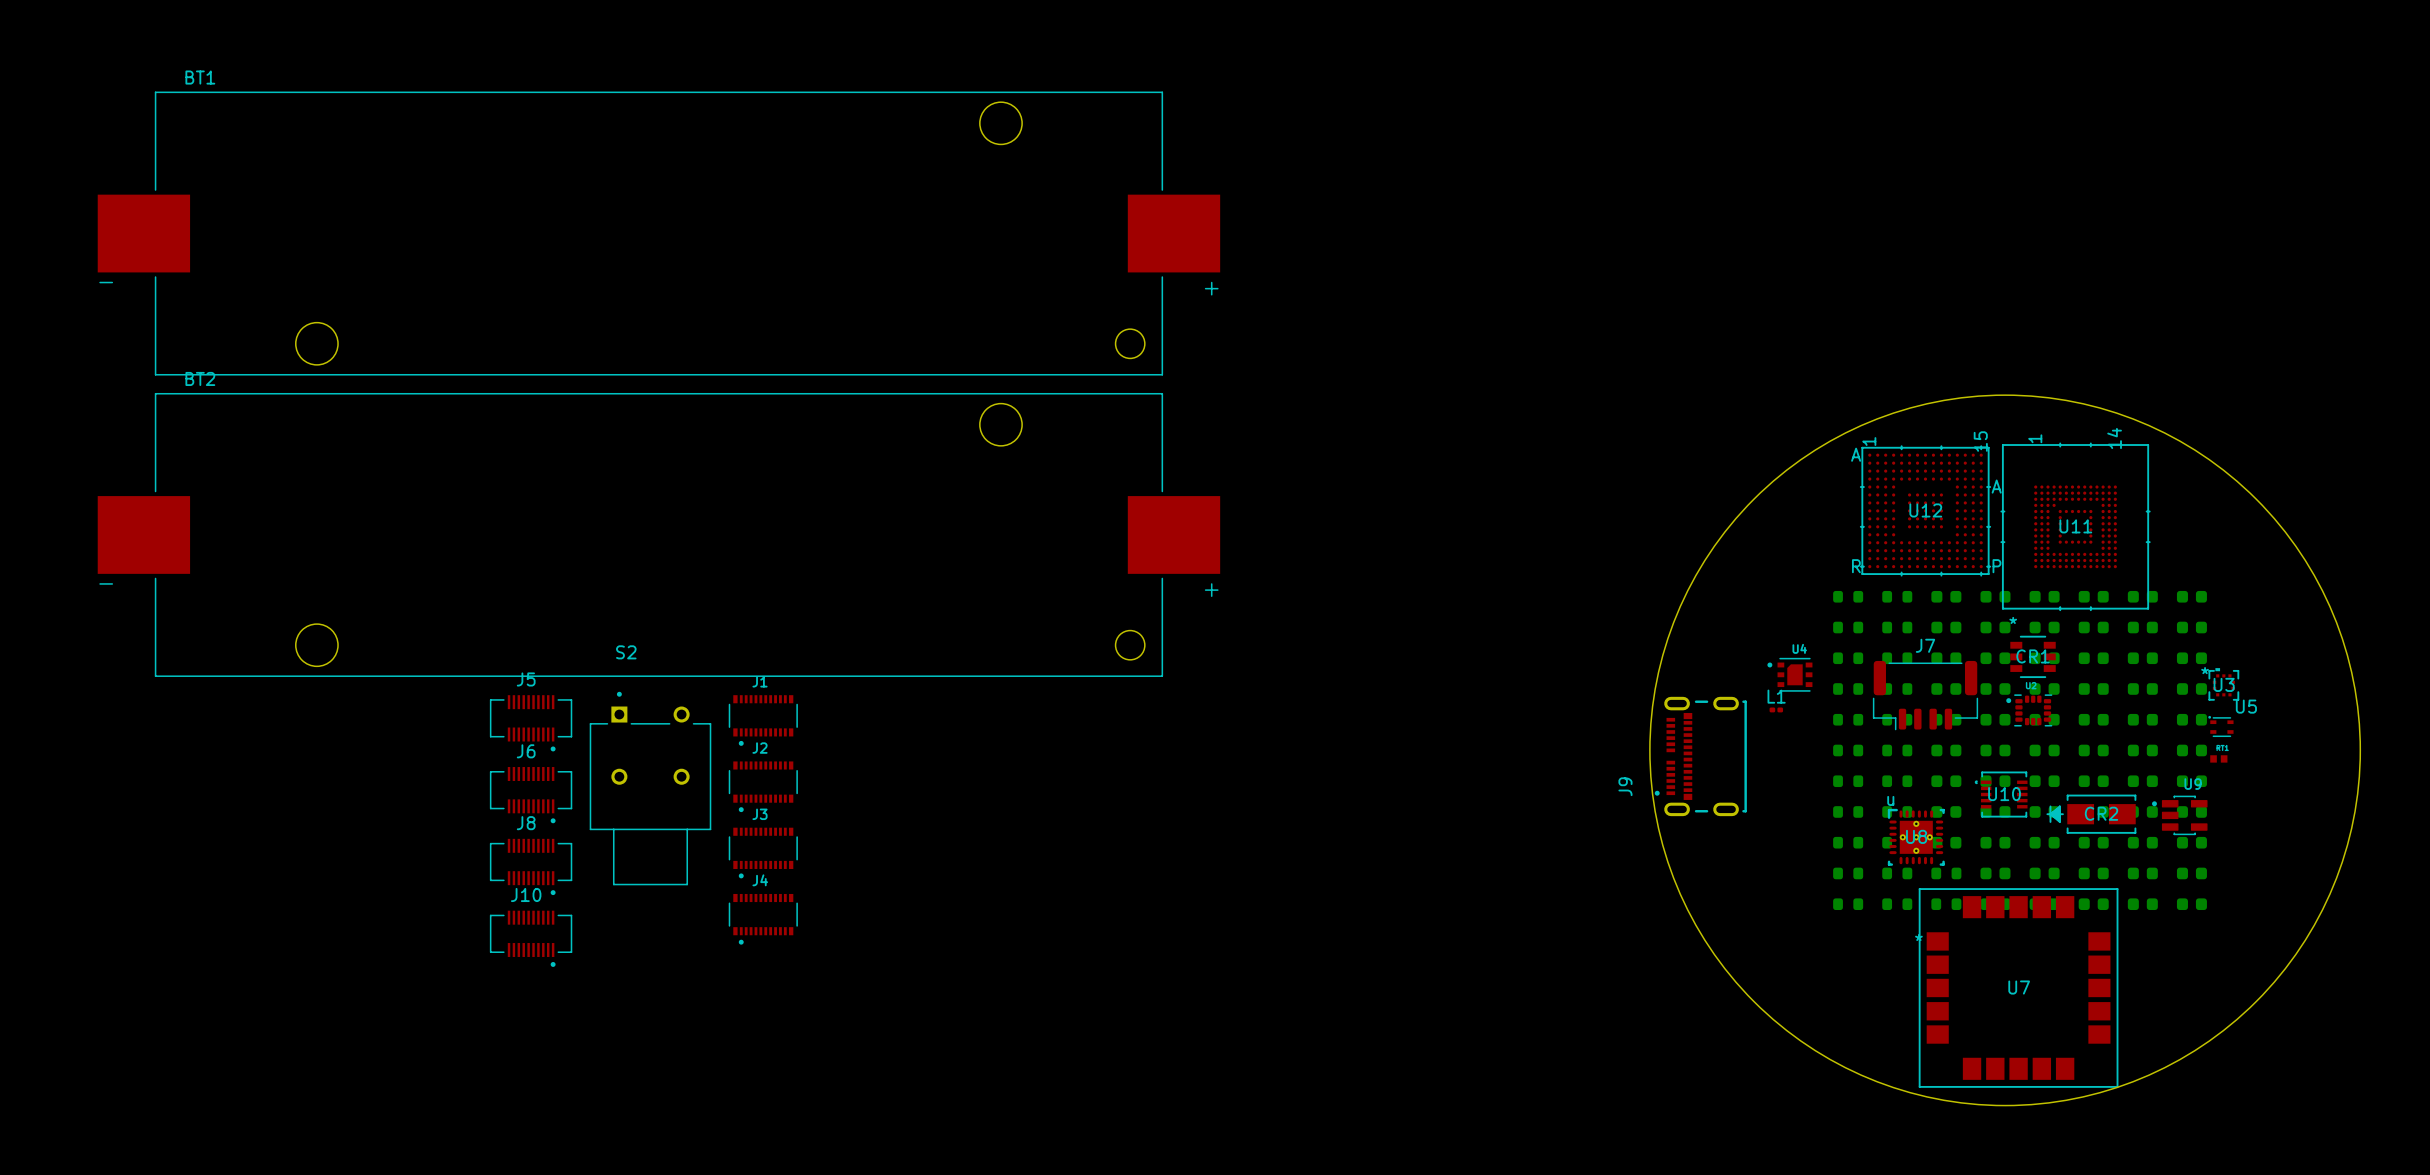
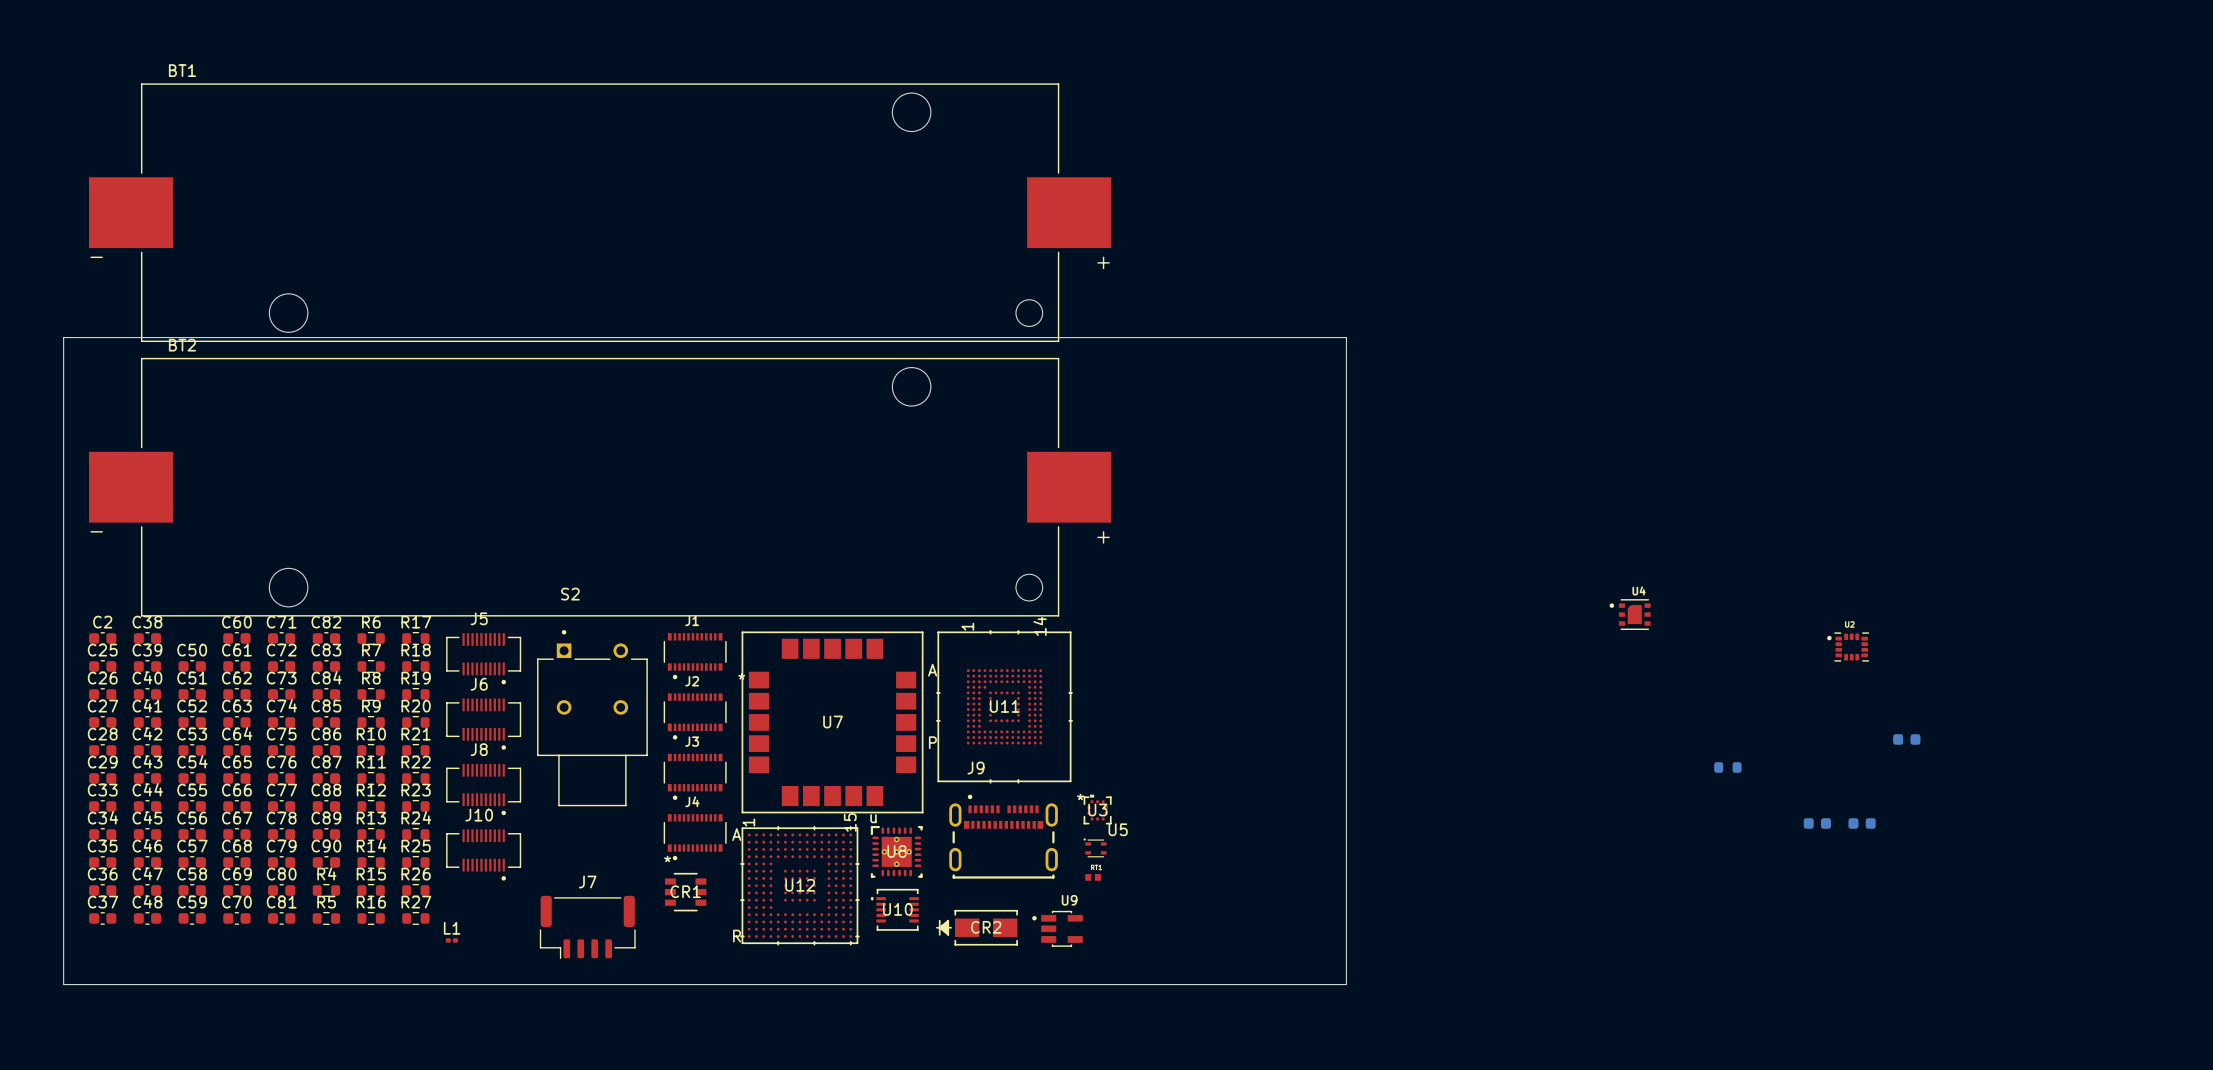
board edge: none -> (63, 337) (1346, 337) (1346, 984) (63, 984) (63, 337)
round board edge: [1649, 394, 2361, 1106] -> none
U12 position: (1925, 510) -> (799, 885)
U11 position: (2075, 526) -> (1004, 706)
part: (1848, 596) -> none
part: (1897, 596) -> none
part: (1946, 596) -> none
part: (1995, 596) -> none
part: (2044, 596) -> none
part: (2093, 596) -> none
part: (2142, 596) -> none
part: (2191, 596) -> none
part: (1848, 627) -> none
part: (1897, 627) -> none
part: (1946, 627) -> none
part: (1995, 627) -> none
part: (2044, 627) -> none
part: (2093, 627) -> none
part: (2142, 627) -> none
part: (2191, 627) -> none
CR1 position: (2033, 656) -> (685, 892)
part: (1848, 658) -> none
part: (1897, 658) -> none
part: (1946, 658) -> none
part: (1995, 658) -> none
part: (2044, 658) -> none
part: (2093, 658) -> none
part: (2142, 658) -> none
part: (2191, 658) -> none
U3 position: (2223, 684) -> (1097, 809)
part: (1848, 688) -> none
part: (1897, 688) -> none
part: (1946, 688) -> none
part: (1995, 688) -> none
part: (2044, 688) -> none
part: (2093, 688) -> none
part: (2142, 688) -> none
part: (2191, 688) -> none
J7 position: (1925, 695) -> (587, 927)
C2: none -> (102, 638)
C38: none -> (147, 638)
C60: none -> (236, 638)
C71: none -> (281, 638)
C82: none -> (326, 638)
R6: none -> (371, 638)
R17: none -> (415, 638)
L1 position: (1776, 709) -> (451, 940)
part: (1848, 719) -> none
part: (1897, 719) -> none
part: (1946, 719) -> none
part: (1995, 719) -> none
part: (2044, 719) -> none
part: (2093, 719) -> none
part: (2142, 719) -> none
part: (2191, 719) -> none
U5 position: (2220, 726) -> (1095, 847)
C25: none -> (102, 666)
C39: none -> (147, 666)
C50: none -> (192, 666)
C61: none -> (236, 666)
C72: none -> (281, 666)
C83: none -> (326, 666)
R7: none -> (371, 666)
R18: none -> (415, 666)
part: (1848, 750) -> none
part: (1897, 750) -> none
part: (1946, 750) -> none
part: (1995, 750) -> none
part: (2044, 750) -> none
part: (2093, 750) -> none
part: (2142, 750) -> none
part: (2191, 750) -> none
J9 rotation: 0° (1700, 756) -> 90° clockwise (1003, 836)
J9 position: (1700, 756) -> (1003, 836)
part position: (2218, 758) -> (1093, 877)
C26: none -> (102, 694)
C40: none -> (147, 694)
C51: none -> (192, 694)
C62: none -> (236, 694)
C73: none -> (281, 694)
C84: none -> (326, 694)
R8: none -> (371, 694)
R19: none -> (415, 694)
part: (1848, 781) -> none
part: (1897, 781) -> none
part: (1946, 781) -> none
part: (1995, 781) -> none
part: (2044, 781) -> none
part: (2093, 781) -> none
part: (2142, 781) -> none
part: (2191, 781) -> none
C27: none -> (102, 722)
C41: none -> (147, 722)
C52: none -> (192, 722)
C63: none -> (236, 722)
C74: none -> (281, 722)
C85: none -> (326, 722)
R9: none -> (371, 722)
R20: none -> (415, 722)
U10 position: (2001, 794) -> (894, 909)
part: (1848, 811) -> none
part: (1897, 811) -> none
part: (1946, 811) -> none
part: (1995, 811) -> none
part: (2044, 811) -> none
part: (2142, 811) -> none
part: (2191, 811) -> none
CR2 position: (2091, 814) -> (976, 927)
U9 position: (2179, 815) -> (1057, 928)
C28: none -> (102, 750)
C42: none -> (147, 750)
C53: none -> (192, 750)
C64: none -> (236, 750)
C75: none -> (281, 750)
C86: none -> (326, 750)
R10: none -> (371, 750)
R21: none -> (415, 750)
U8 position: (1916, 837) -> (896, 851)
part: (1848, 842) -> none
part: (1946, 842) -> none
part: (1995, 842) -> none
part: (2044, 842) -> none
part: (2093, 842) -> none
part: (2142, 842) -> none
part: (2191, 842) -> none
C29: none -> (102, 778)
C43: none -> (147, 778)
C54: none -> (192, 778)
C65: none -> (236, 778)
C76: none -> (281, 778)
C87: none -> (326, 778)
R11: none -> (371, 778)
R22: none -> (415, 778)
part: (1848, 873) -> none
part: (1897, 873) -> none
part: (1946, 873) -> none
part: (1995, 873) -> none
part: (2044, 873) -> none
part: (2093, 873) -> none
part: (2142, 873) -> none
part: (2191, 873) -> none
C33: none -> (102, 806)
C44: none -> (147, 806)
C55: none -> (192, 806)
C66: none -> (236, 806)
C77: none -> (281, 806)
C88: none -> (326, 806)
R12: none -> (371, 806)
R23: none -> (415, 806)
part: (1848, 904) -> none
part: (1897, 904) -> none
part: (1946, 904) -> none
part: (2093, 904) -> none
part: (2142, 904) -> none
part: (2191, 904) -> none
C34: none -> (102, 834)
C45: none -> (147, 834)
C56: none -> (192, 834)
C67: none -> (236, 834)
C78: none -> (281, 834)
C89: none -> (326, 834)
R13: none -> (371, 834)
R24: none -> (415, 834)
C35: none -> (102, 862)
C46: none -> (147, 862)
C57: none -> (192, 862)
C68: none -> (236, 862)
C79: none -> (281, 862)
C90: none -> (326, 862)
R14: none -> (371, 862)
R25: none -> (415, 862)
C36: none -> (102, 890)
C47: none -> (147, 890)
C58: none -> (192, 890)
C69: none -> (236, 890)
C80: none -> (281, 890)
R4: none -> (326, 890)
R15: none -> (371, 890)
R26: none -> (415, 890)
U7 position: (2018, 987) -> (832, 722)
C37: none -> (102, 918)
C48: none -> (147, 918)
C59: none -> (192, 918)
C70: none -> (236, 918)
C81: none -> (281, 918)
R5: none -> (326, 918)
R16: none -> (371, 918)
R27: none -> (415, 918)

